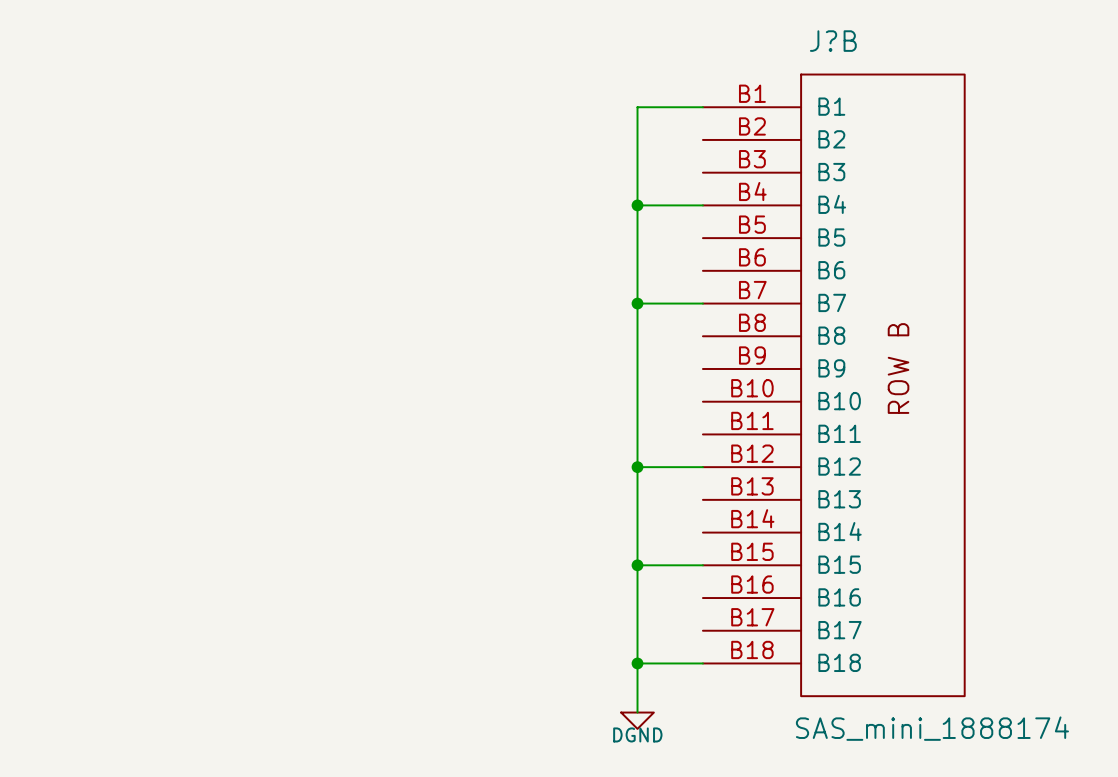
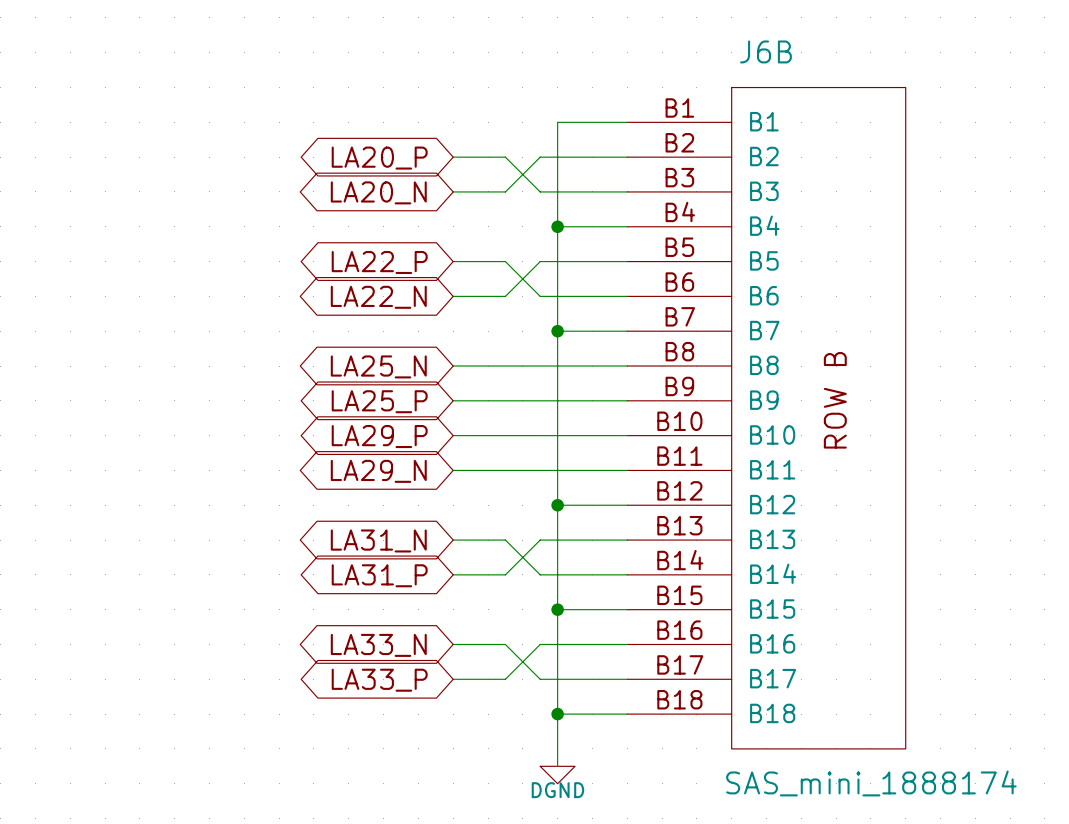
J?B name: J?B (833, 41) -> J6B (765, 51)
wire: none -> (453, 157) (505, 157) (540, 191) (627, 191)
wire: none -> (627, 157) (540, 157) (505, 191) (453, 191)
global label: none -> LA20_P (379, 158)
global label: none -> LA20_N (378, 192)
global label: none -> LA22_P (379, 262)
wire: none -> (453, 261) (505, 261) (540, 296) (627, 296)
wire: none -> (627, 261) (540, 261) (505, 296) (453, 296)
global label: none -> LA22_N (378, 297)
wire: none -> (453, 366) (627, 366)
global label: none -> LA25_N (378, 366)
wire: none -> (453, 400) (627, 400)
global label: none -> LA25_P (379, 401)
wire: none -> (453, 435) (627, 435)
global label: none -> LA29_P (379, 436)
wire: none -> (453, 470) (627, 470)
global label: none -> LA29_N (378, 471)
wire: none -> (453, 540) (505, 540) (540, 574) (627, 574)
wire: none -> (627, 540) (540, 540) (505, 574) (453, 574)
global label: none -> LA31_N (378, 540)
global label: none -> LA31_P (379, 575)
global label: none -> LA33_N (378, 645)
wire: none -> (453, 644) (505, 644) (540, 679) (627, 679)
wire: none -> (627, 644) (540, 644) (505, 679) (453, 679)
global label: none -> LA33_P (379, 680)

